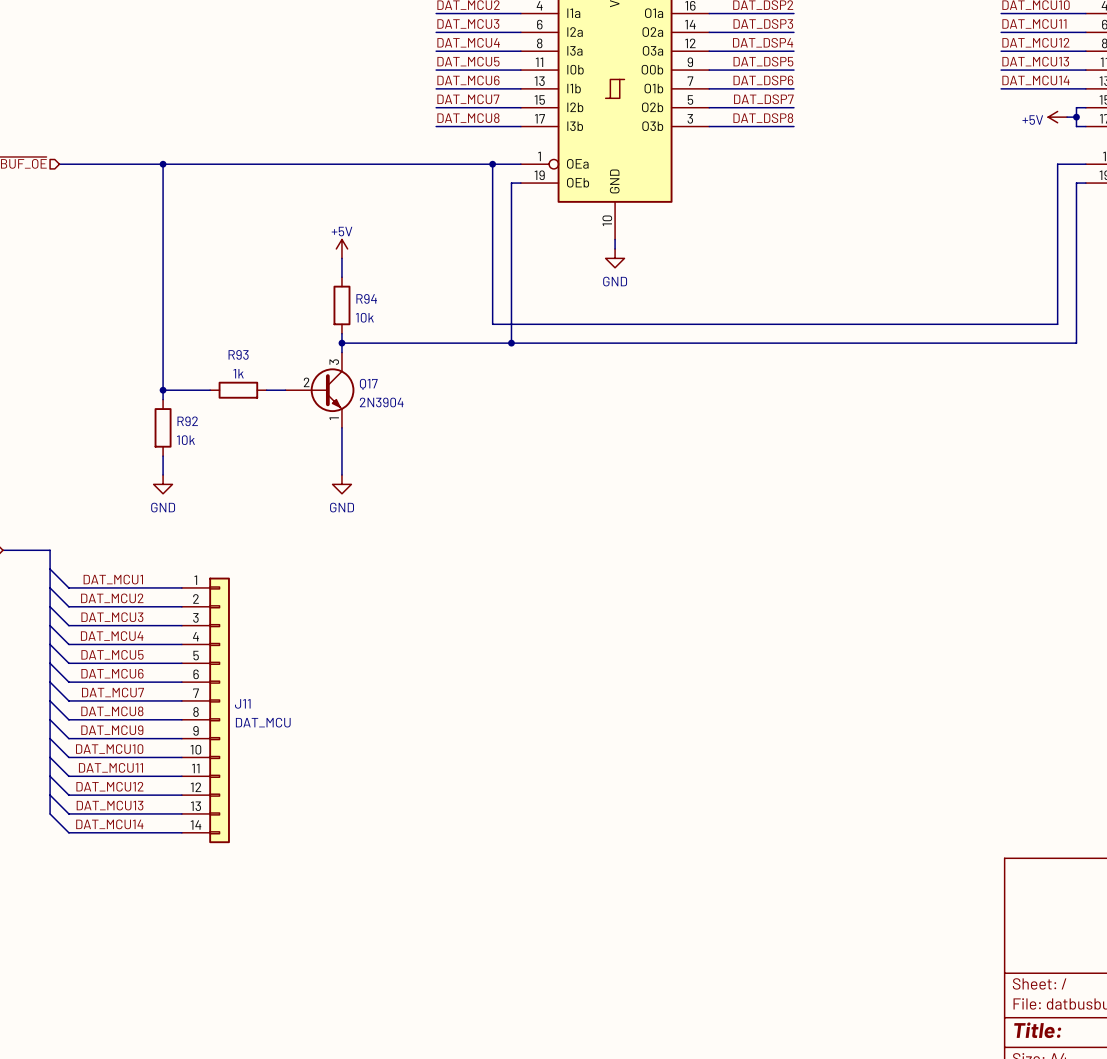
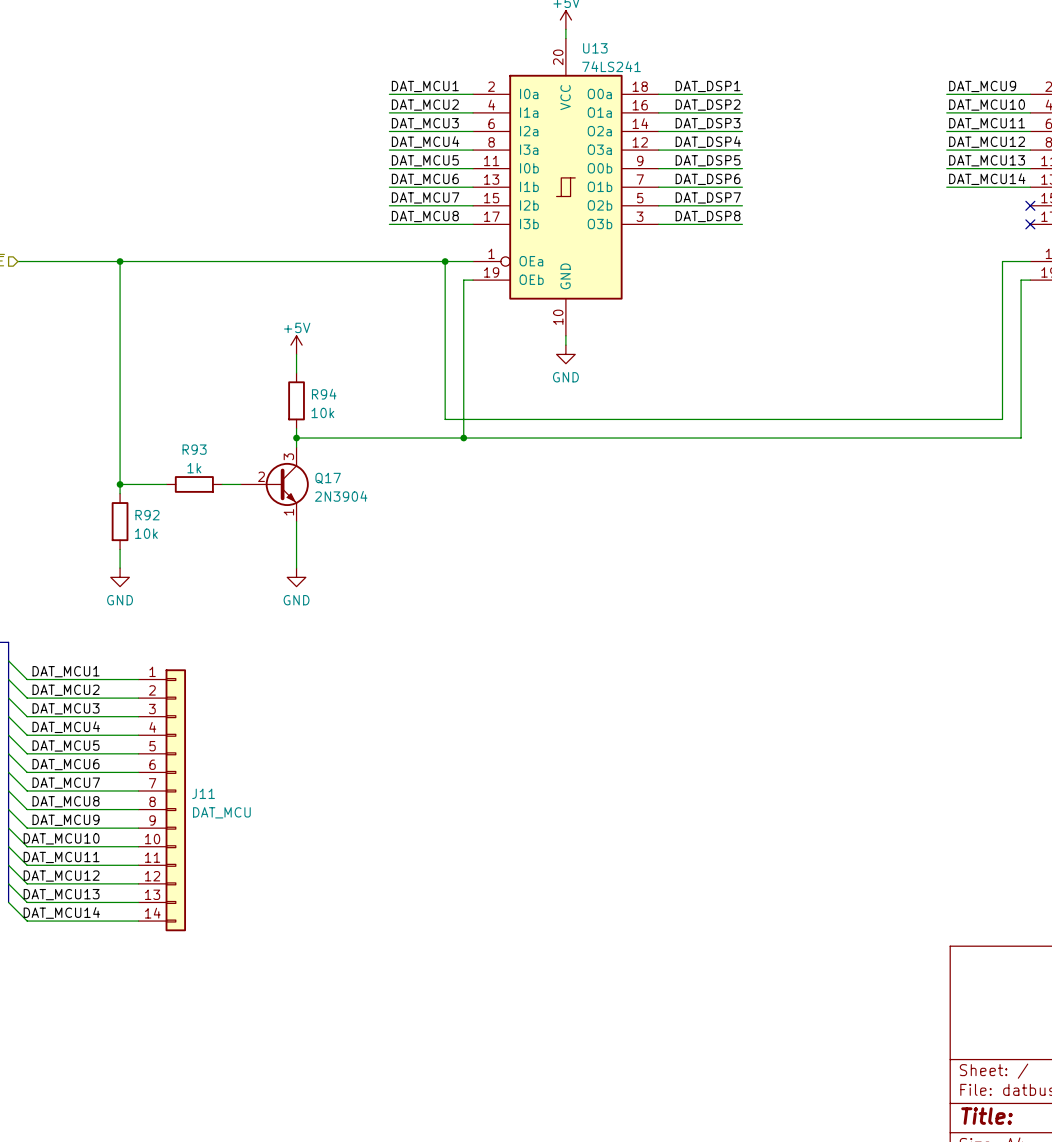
wire: (1085, 107) (1076, 107) (1076, 126) (1085, 126) -> none
no-connect mark: none -> (1030, 205)
power symbol: +5V (1057, 117) -> none
wire: (1067, 117) (1076, 117) -> none
junction: (1076, 117) -> none
no-connect mark: none -> (1030, 224)

